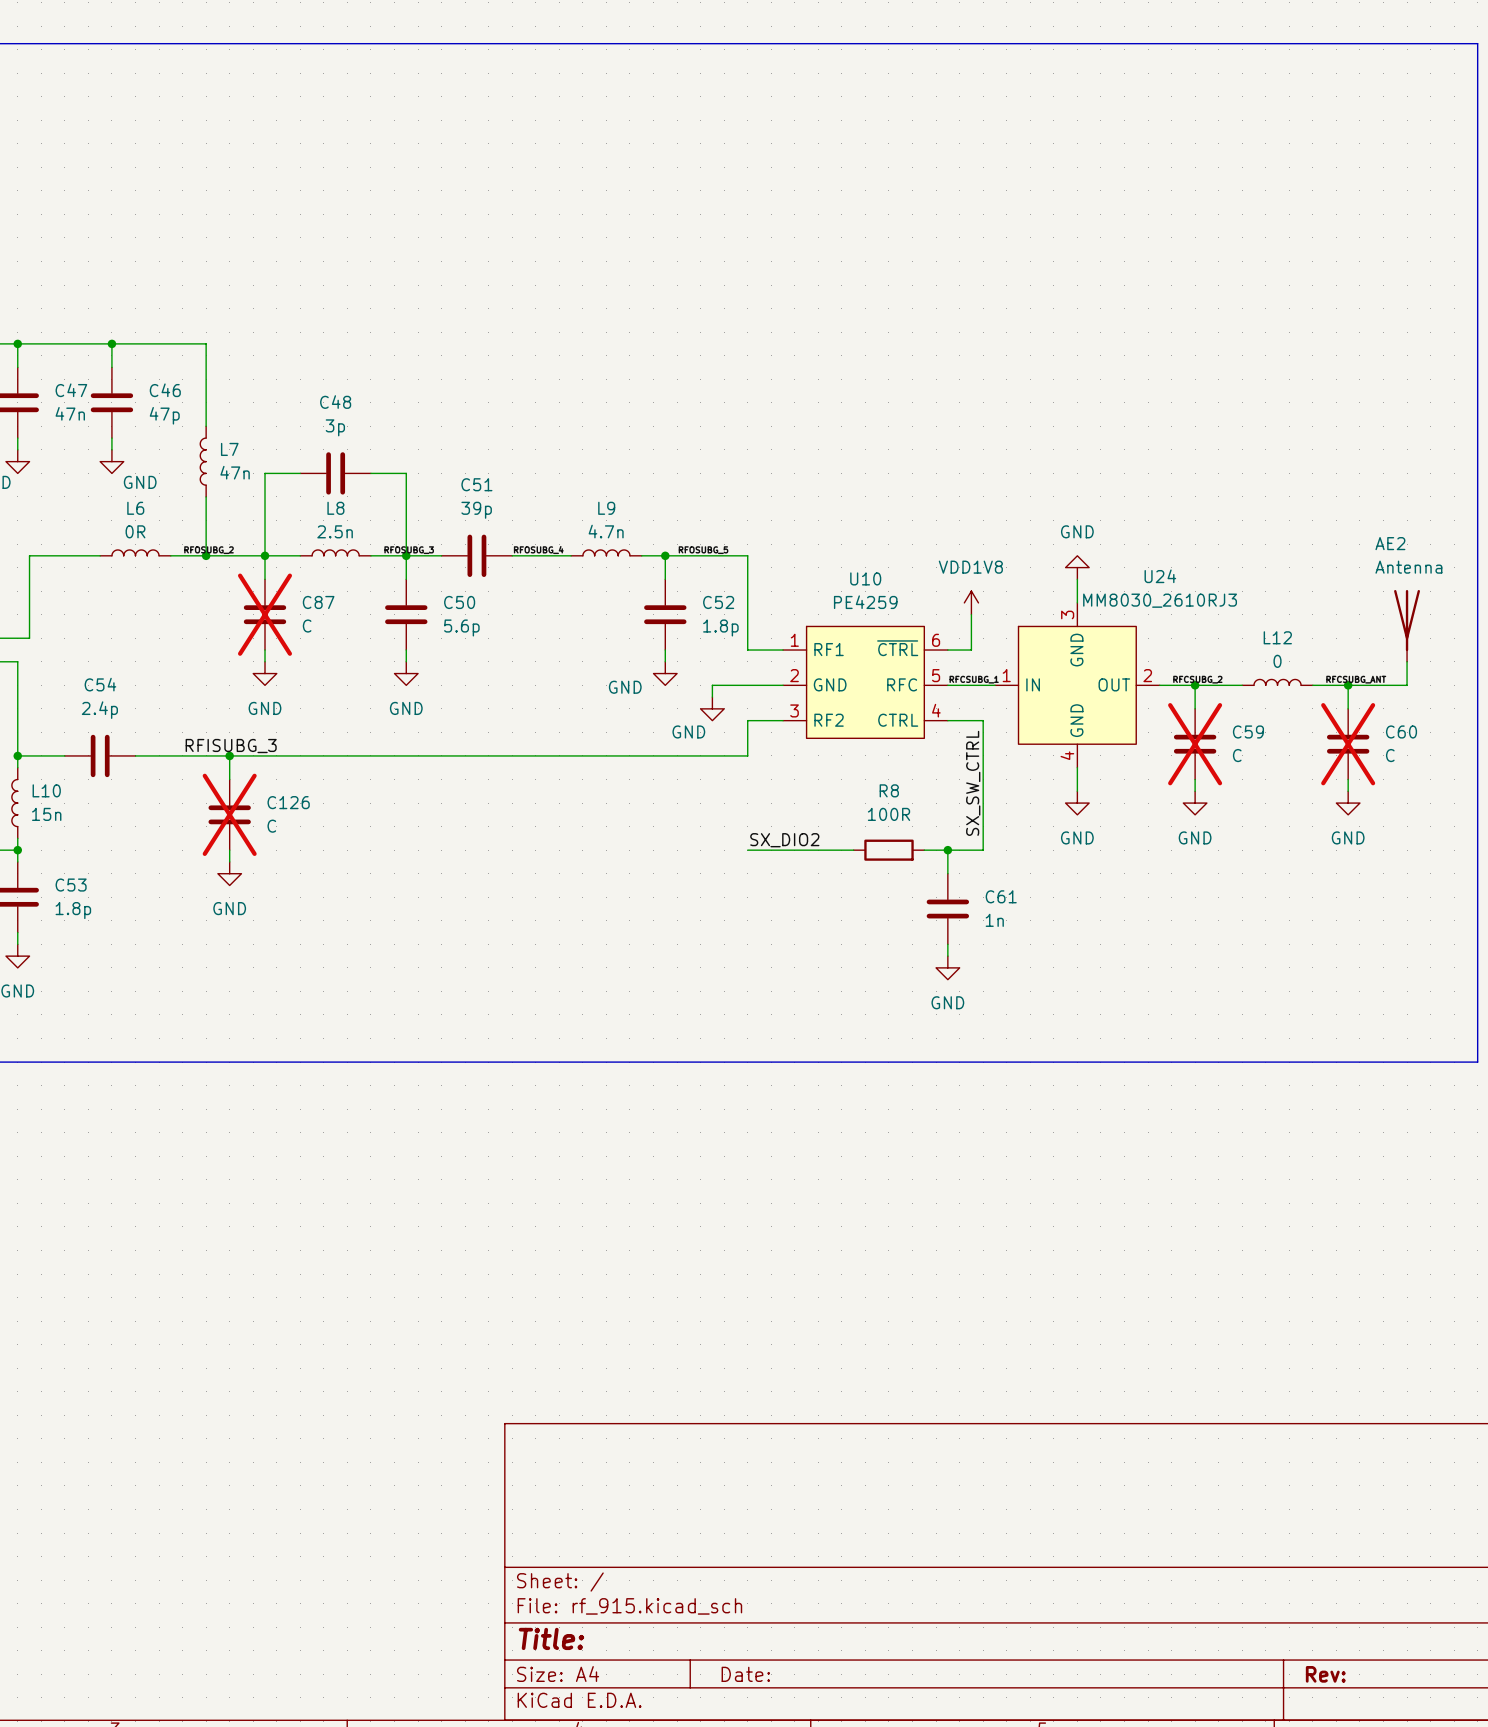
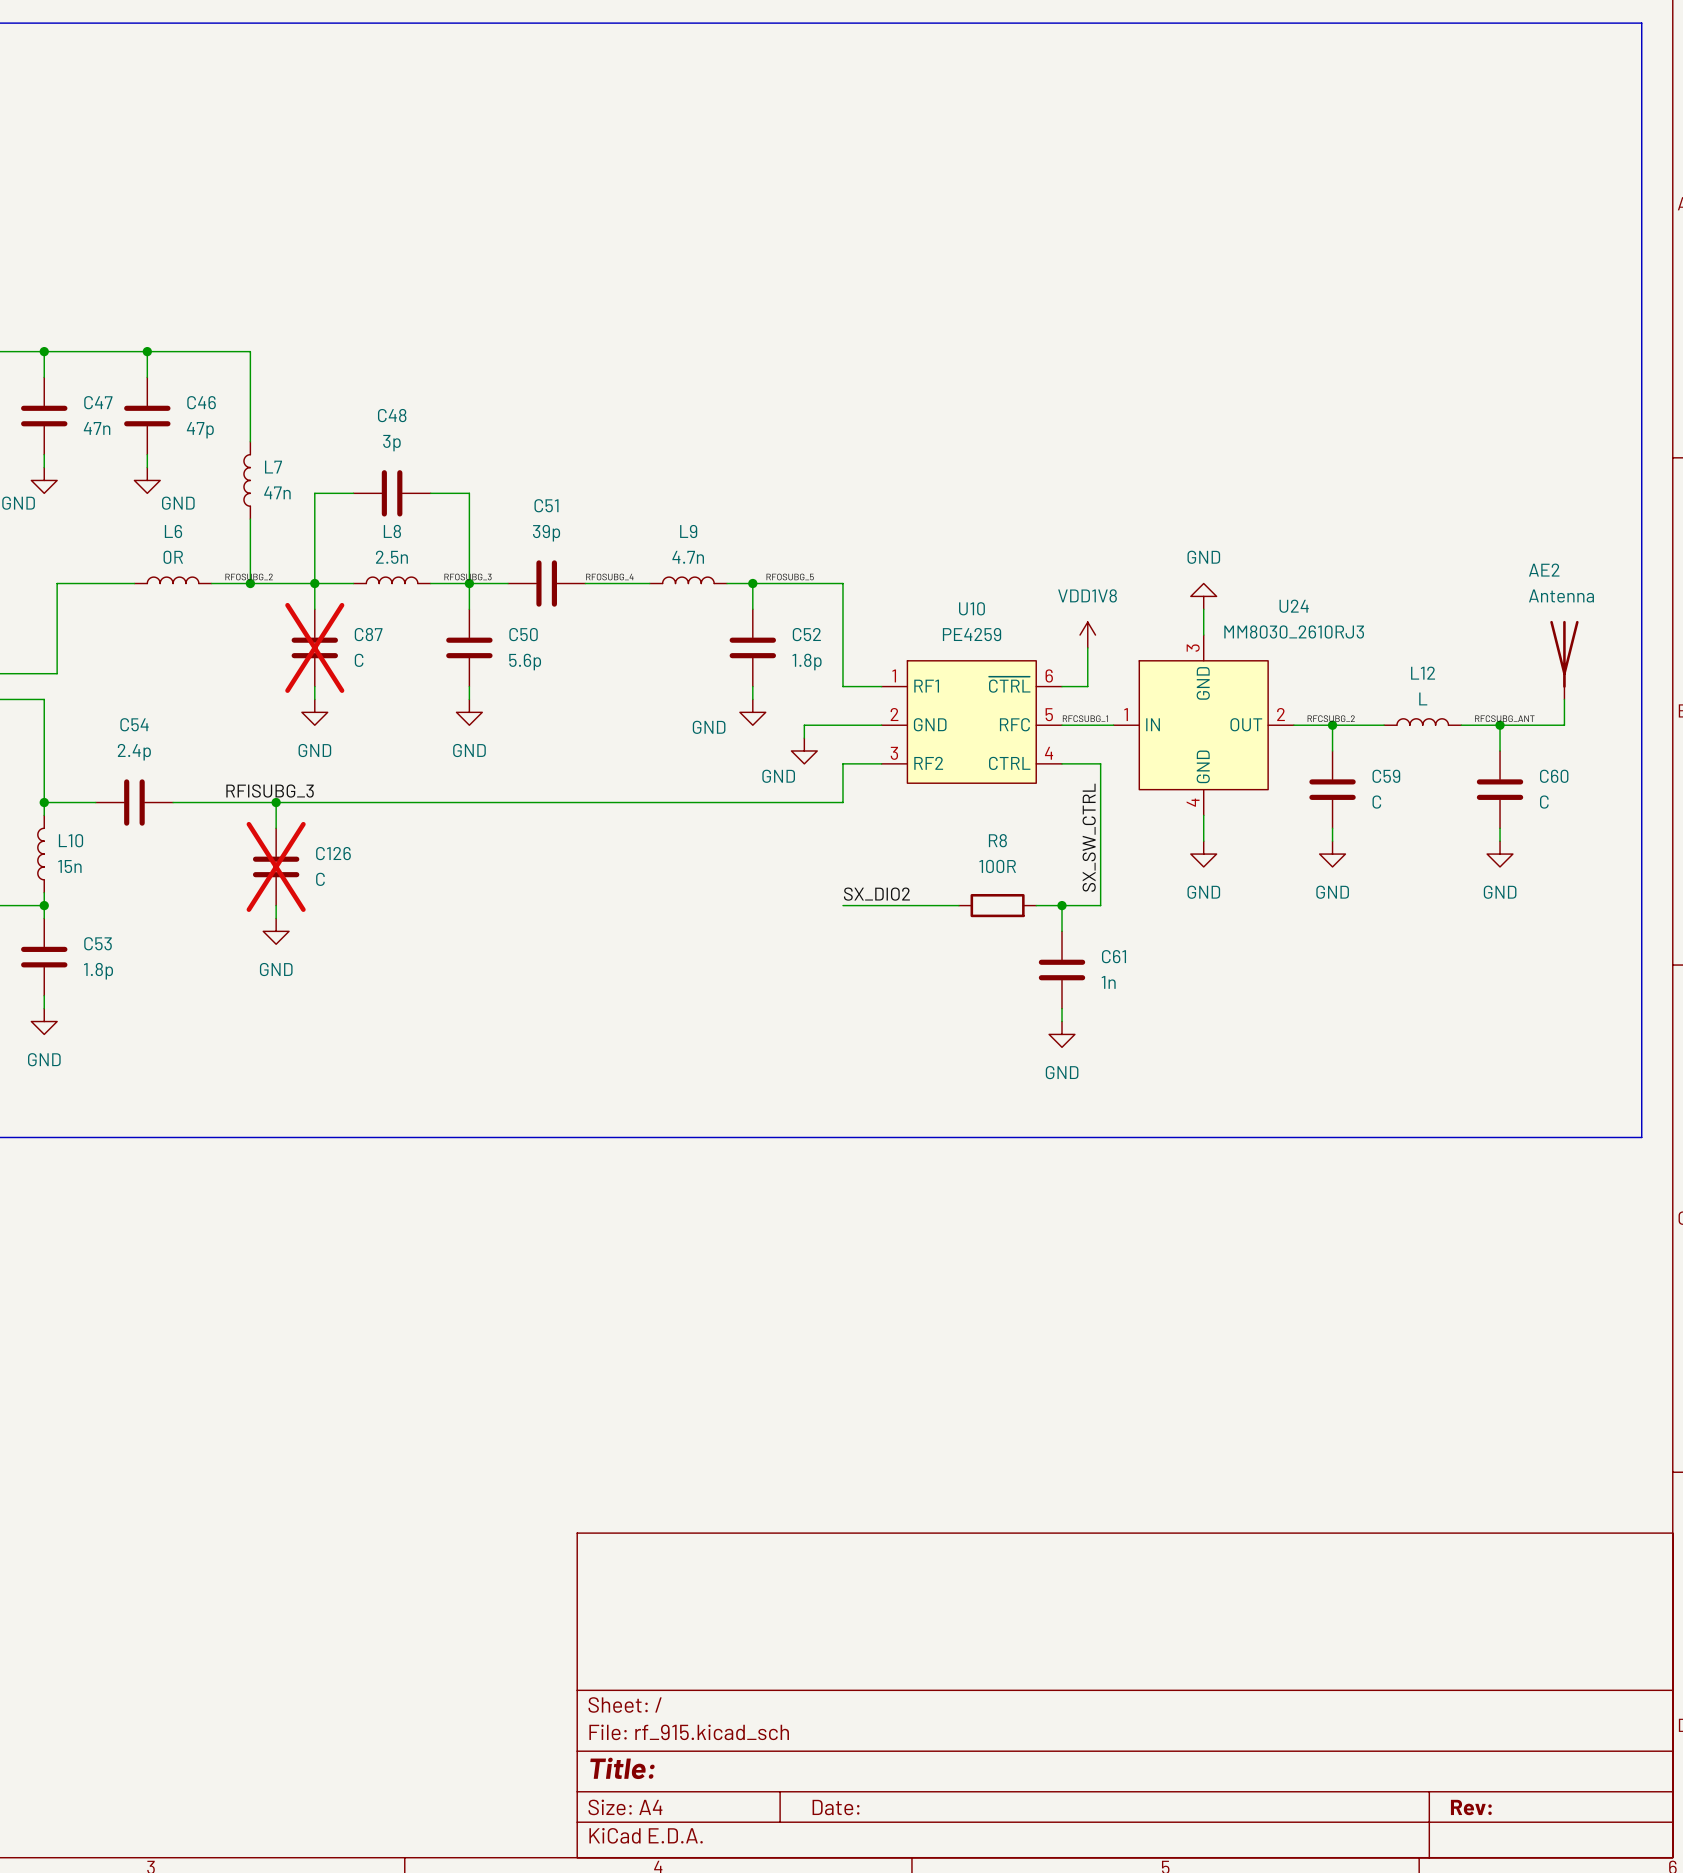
L12 value: 0 (1277, 661) -> L (1423, 698)
C59 do-not-place cross: (1195, 744) -> none
C60 do-not-place cross: (1348, 744) -> none

